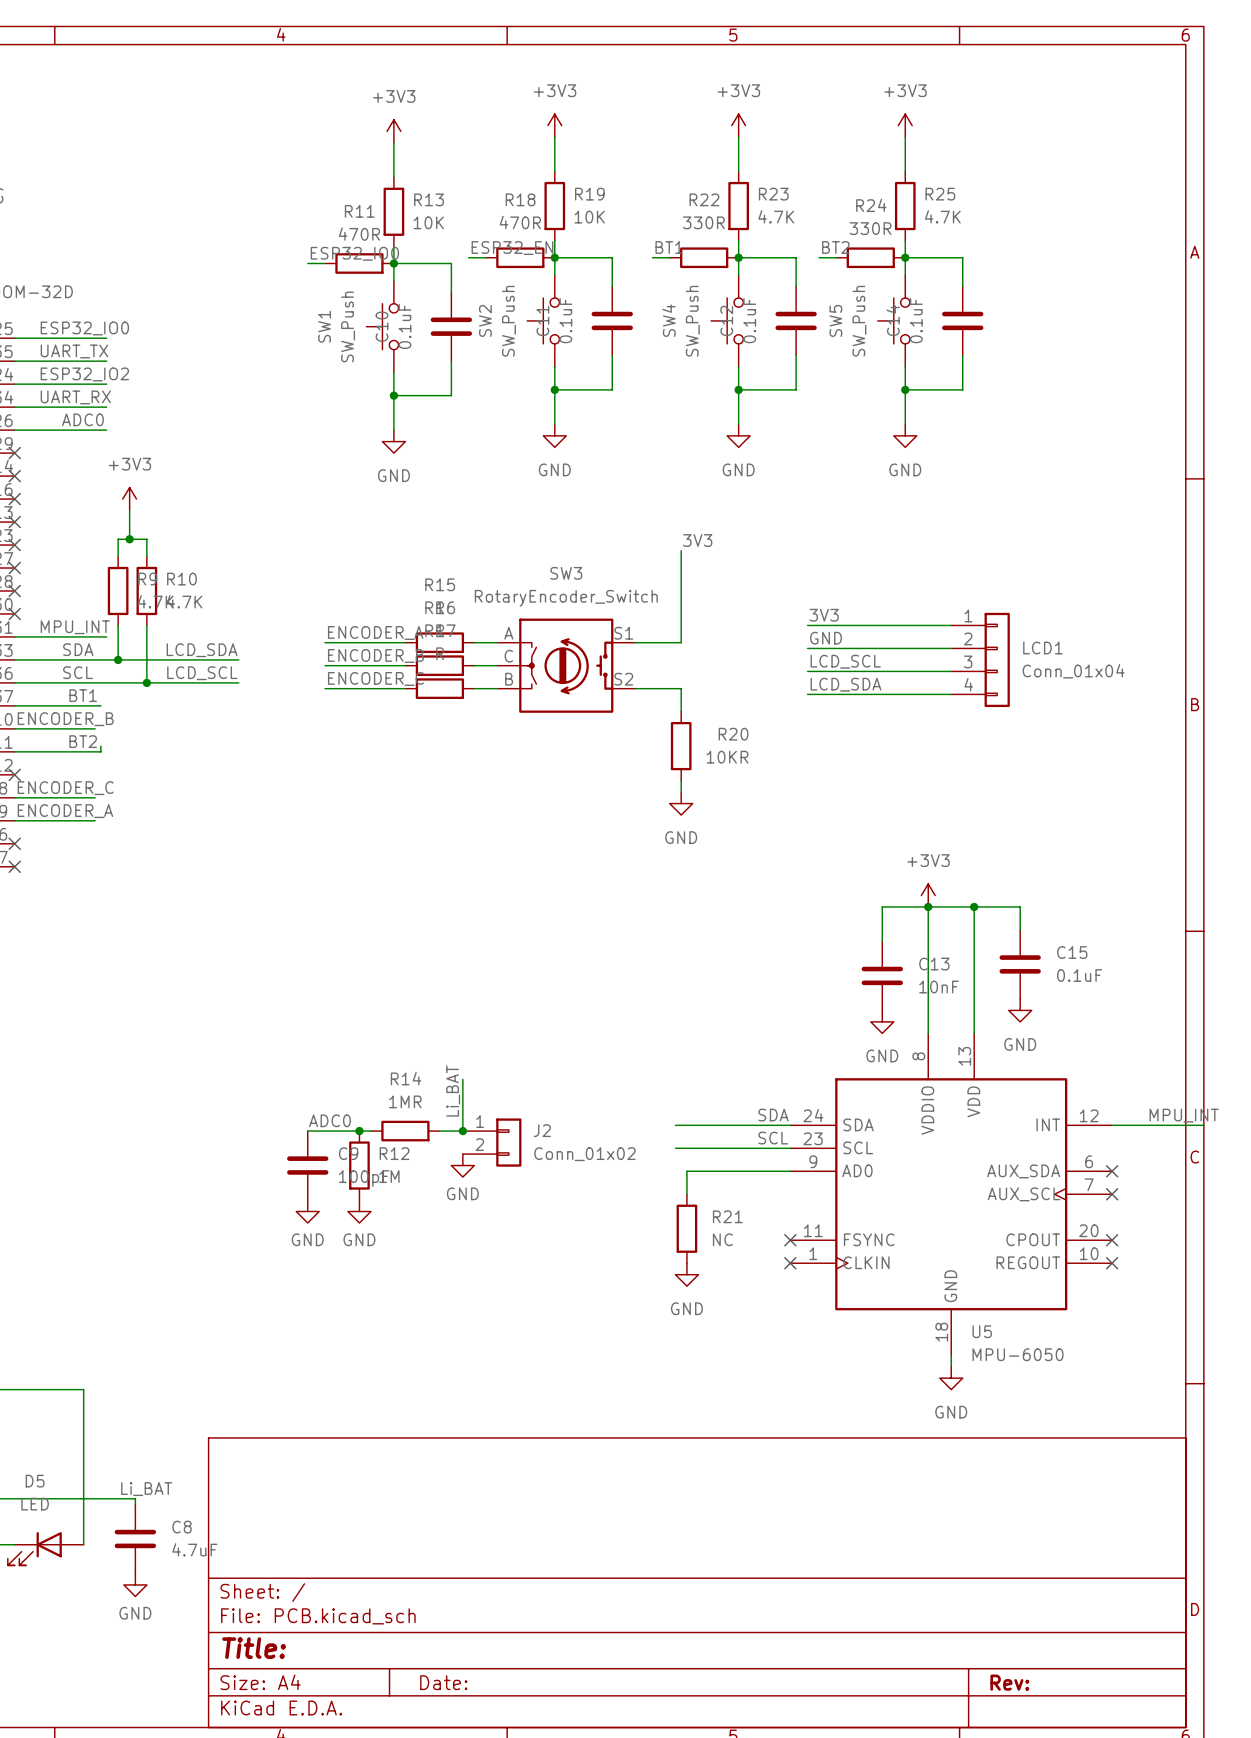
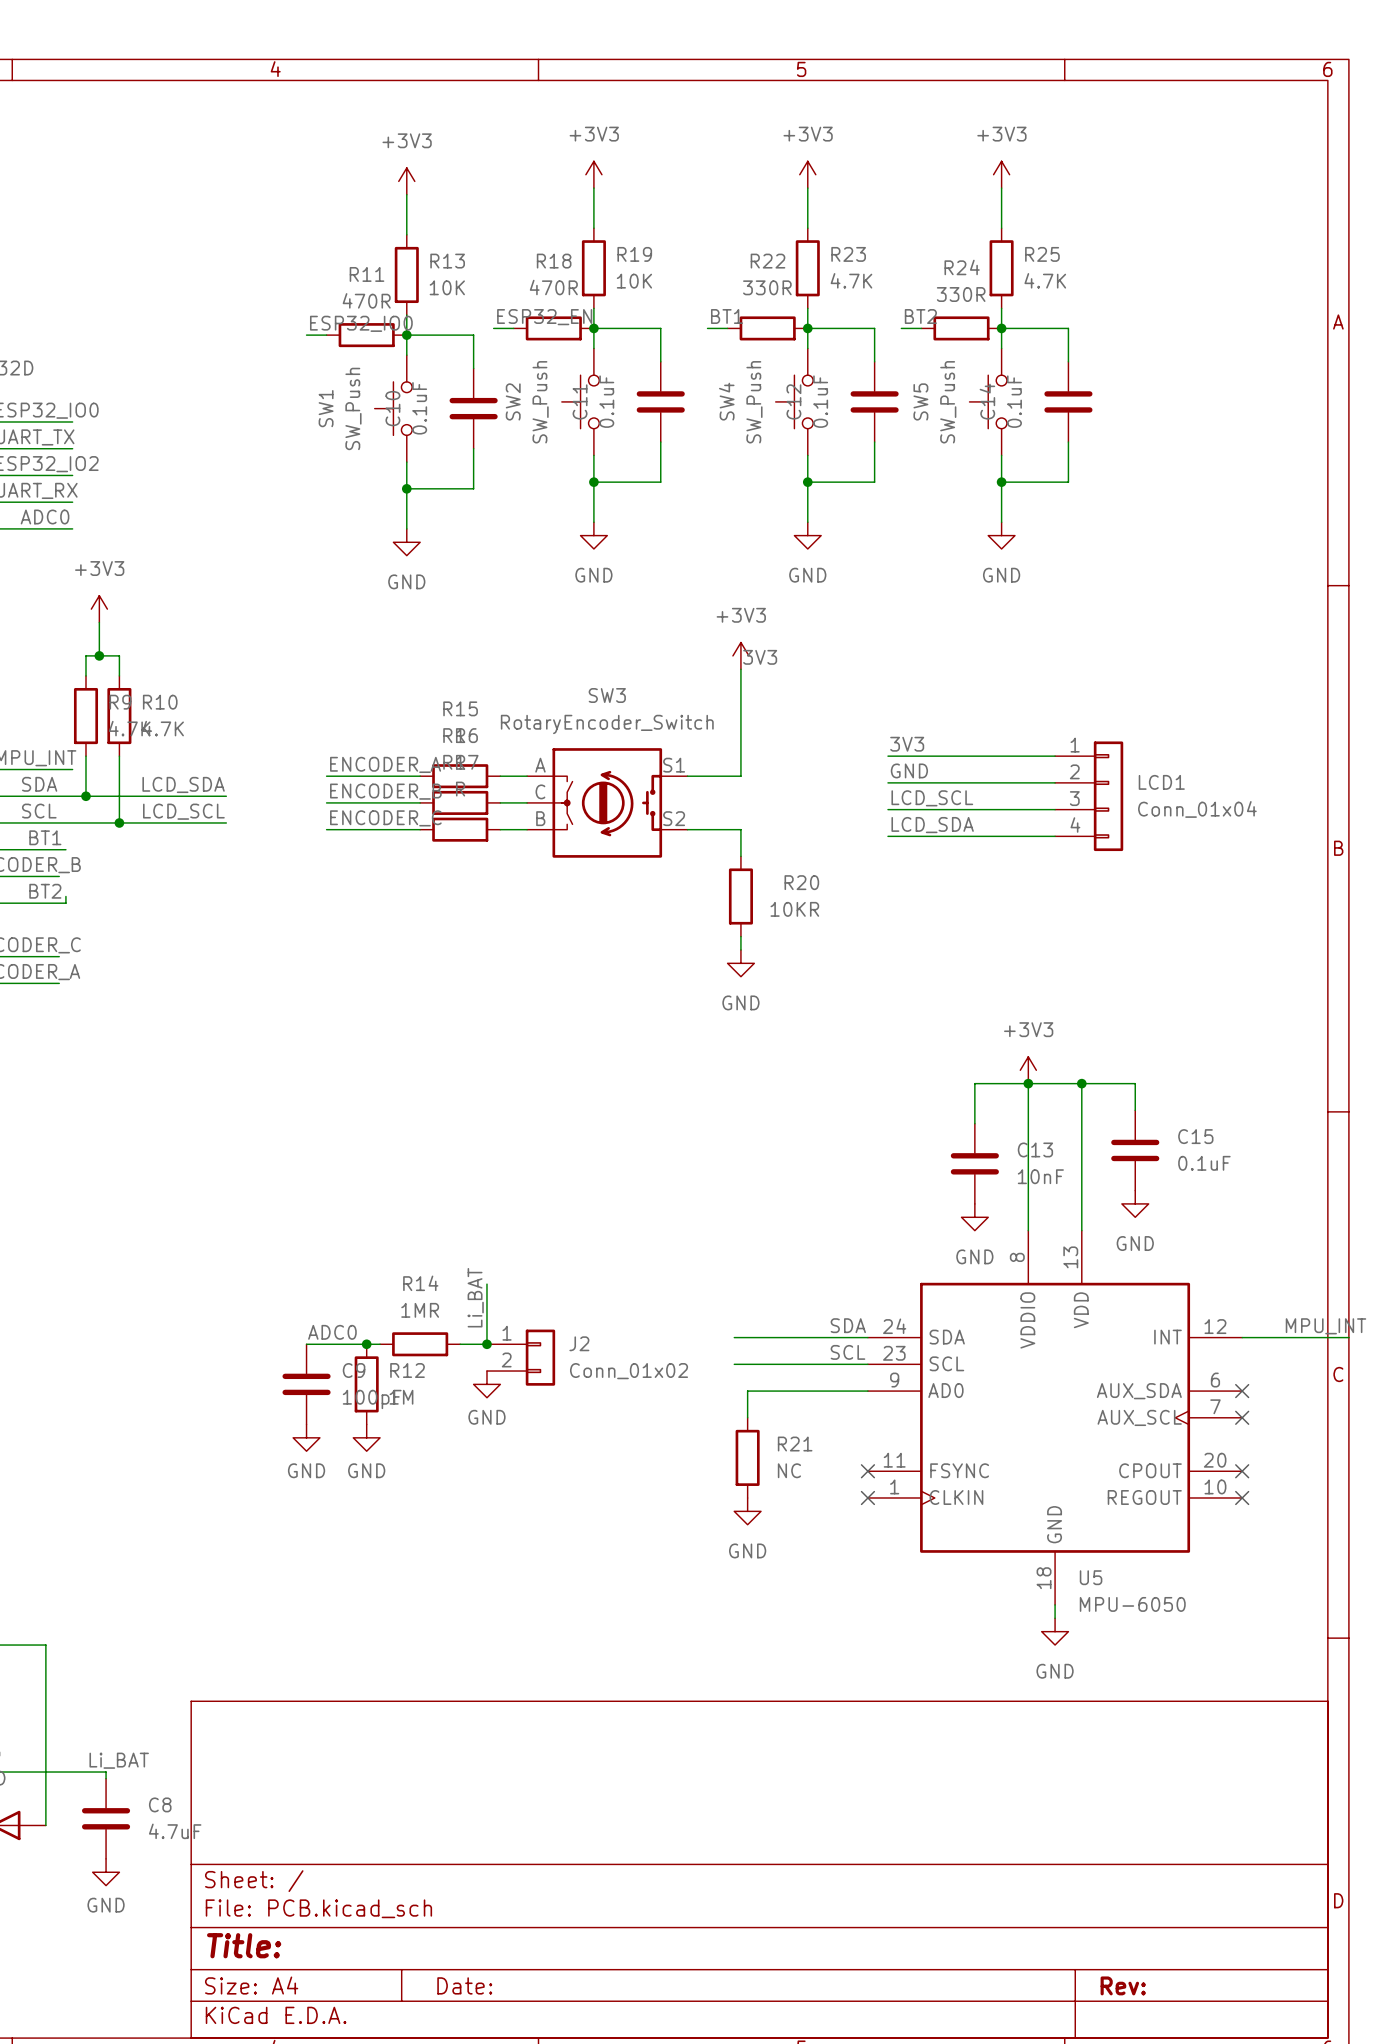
power symbol: none -> +3V3 (740, 655)

